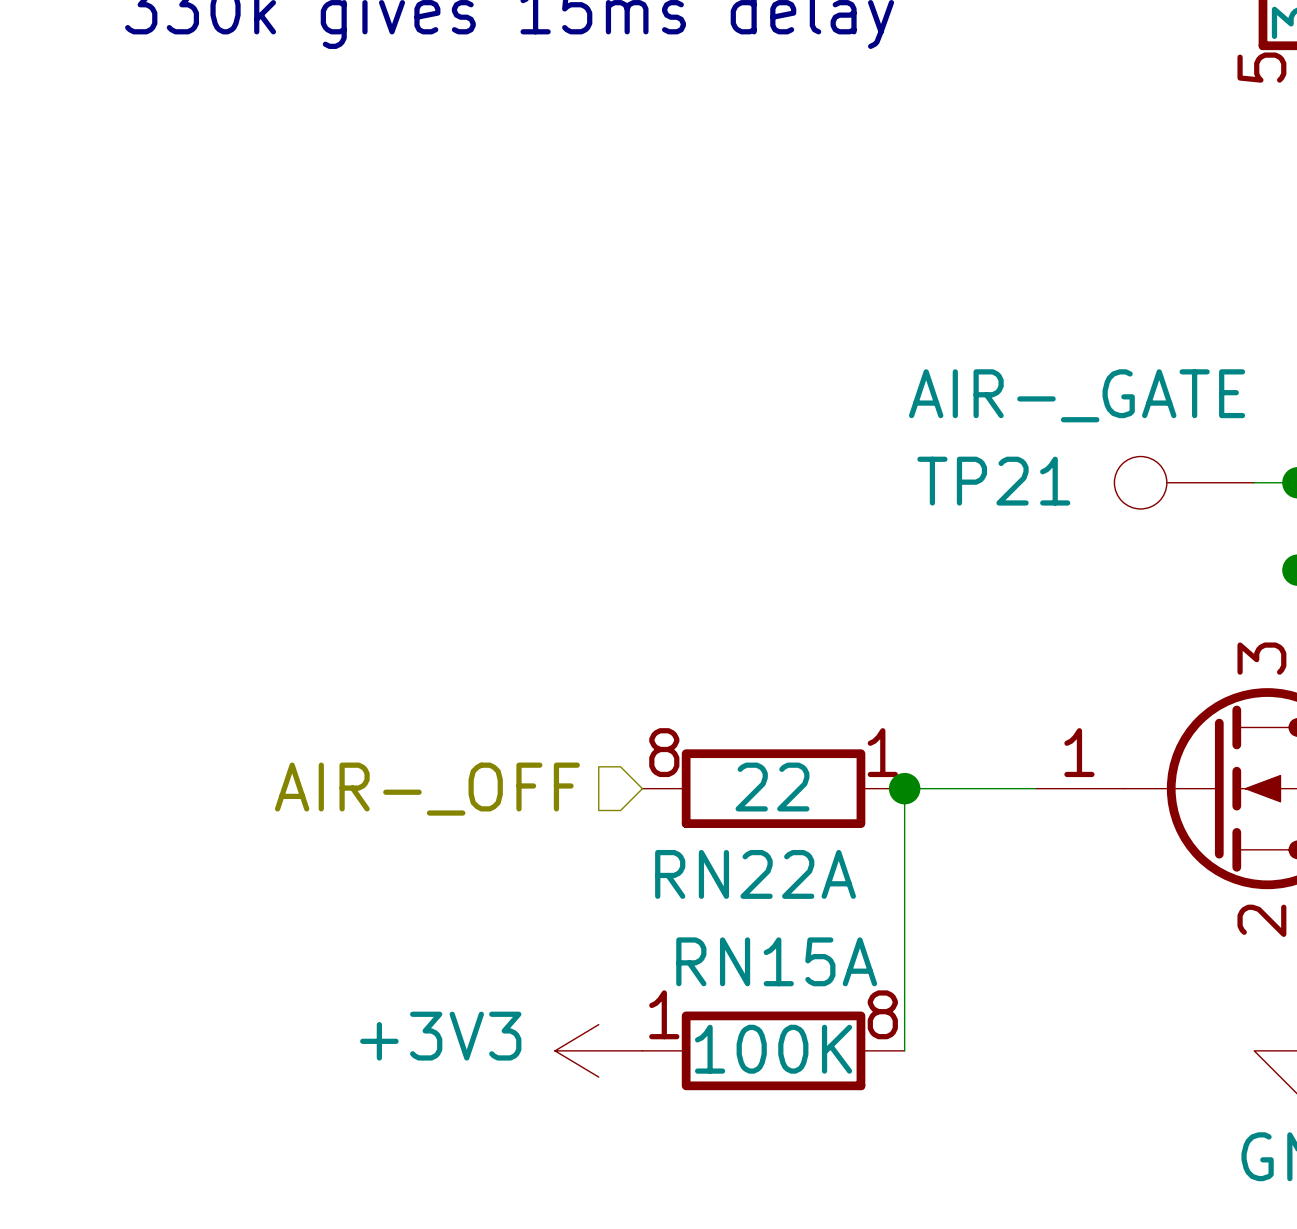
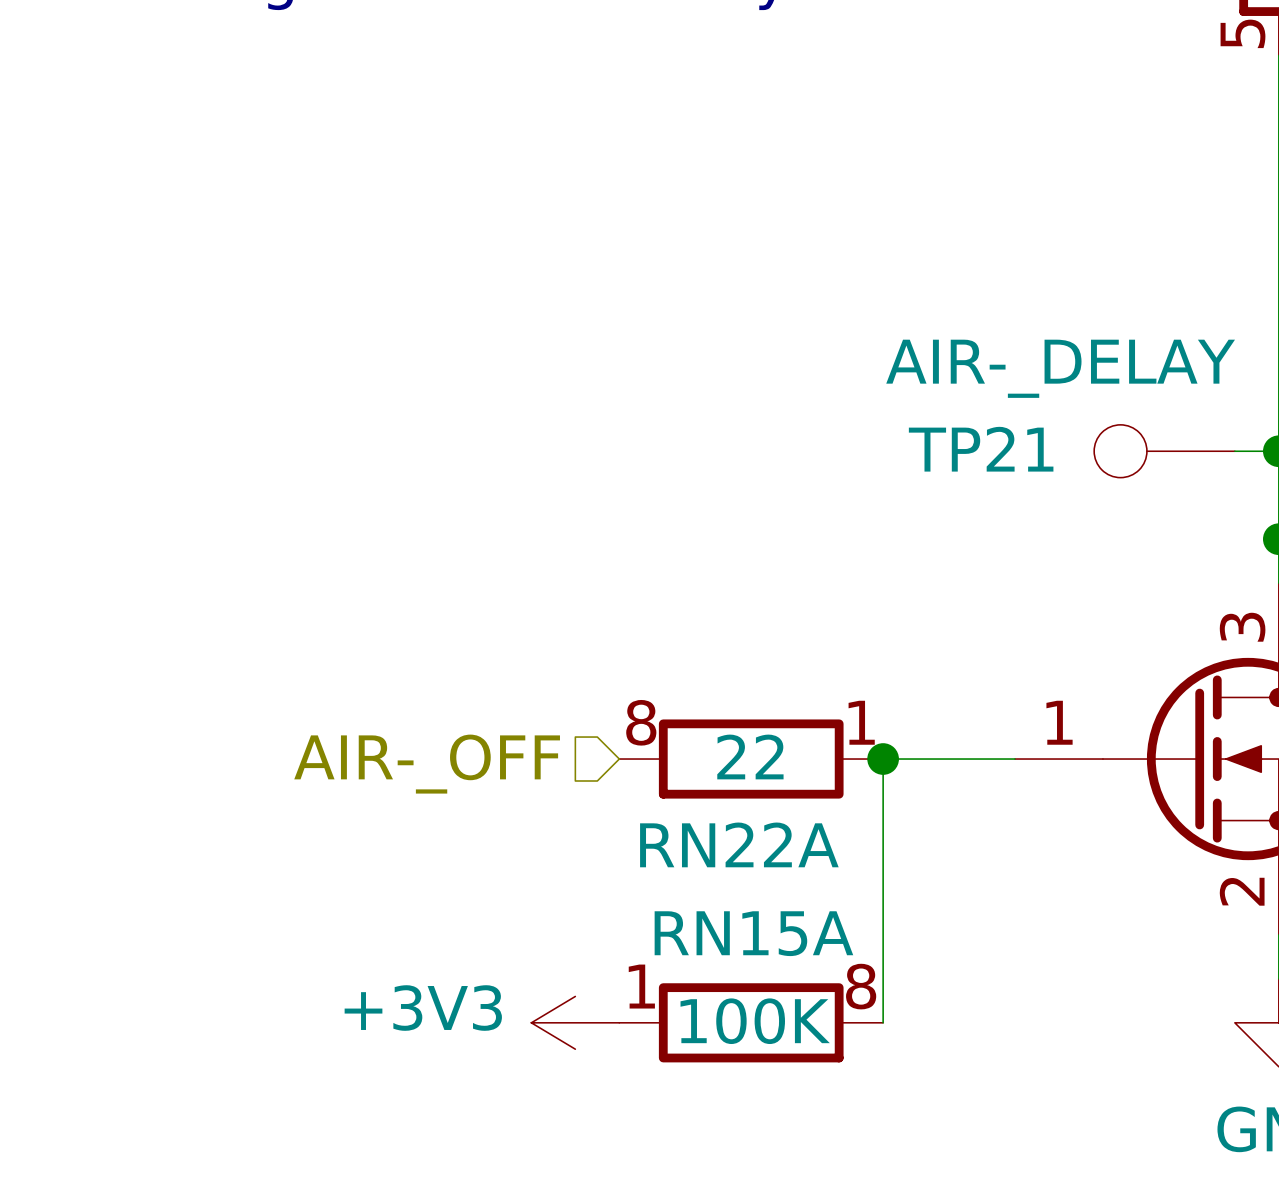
TP21 value: AIR-_GATE (1077, 395) -> AIR-_DELAY (1060, 368)

